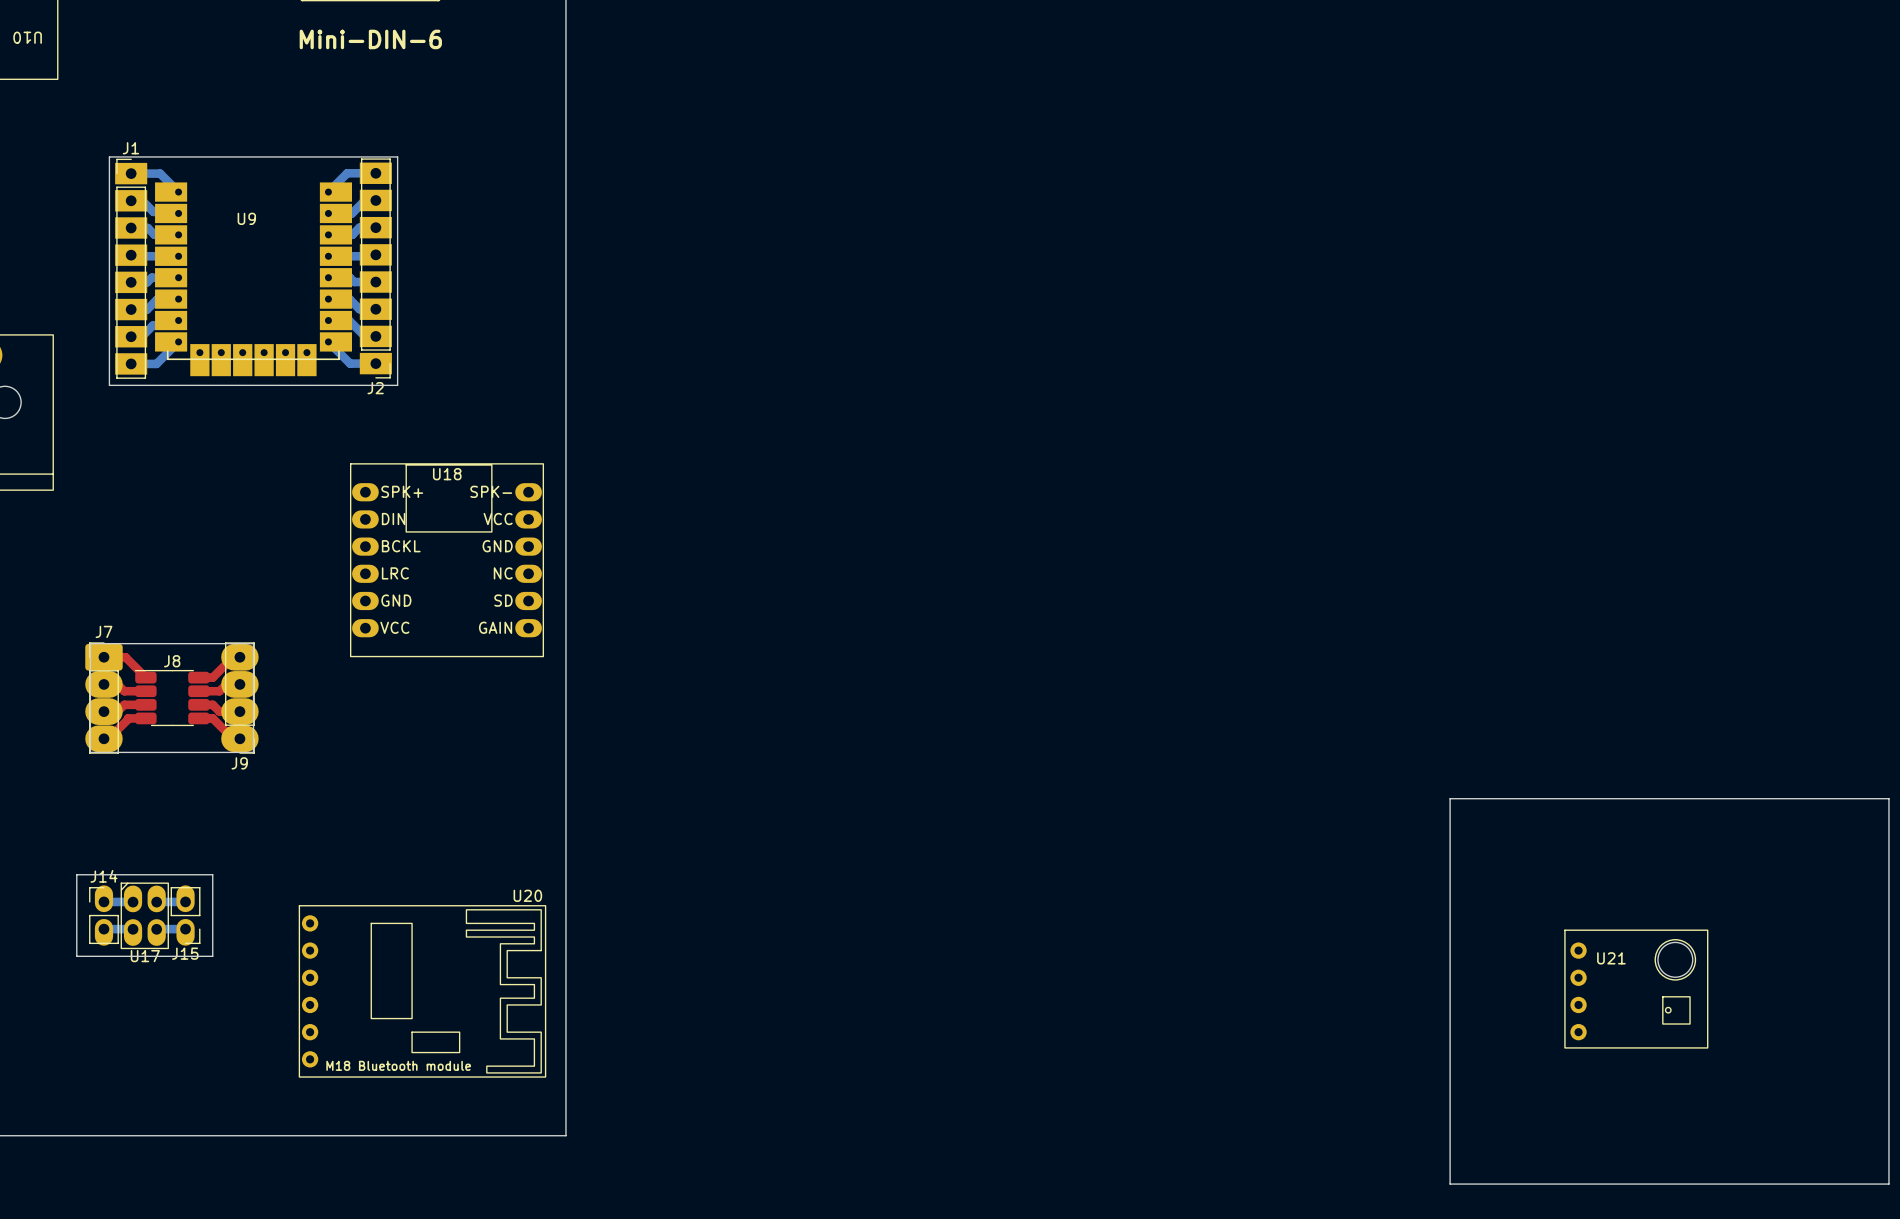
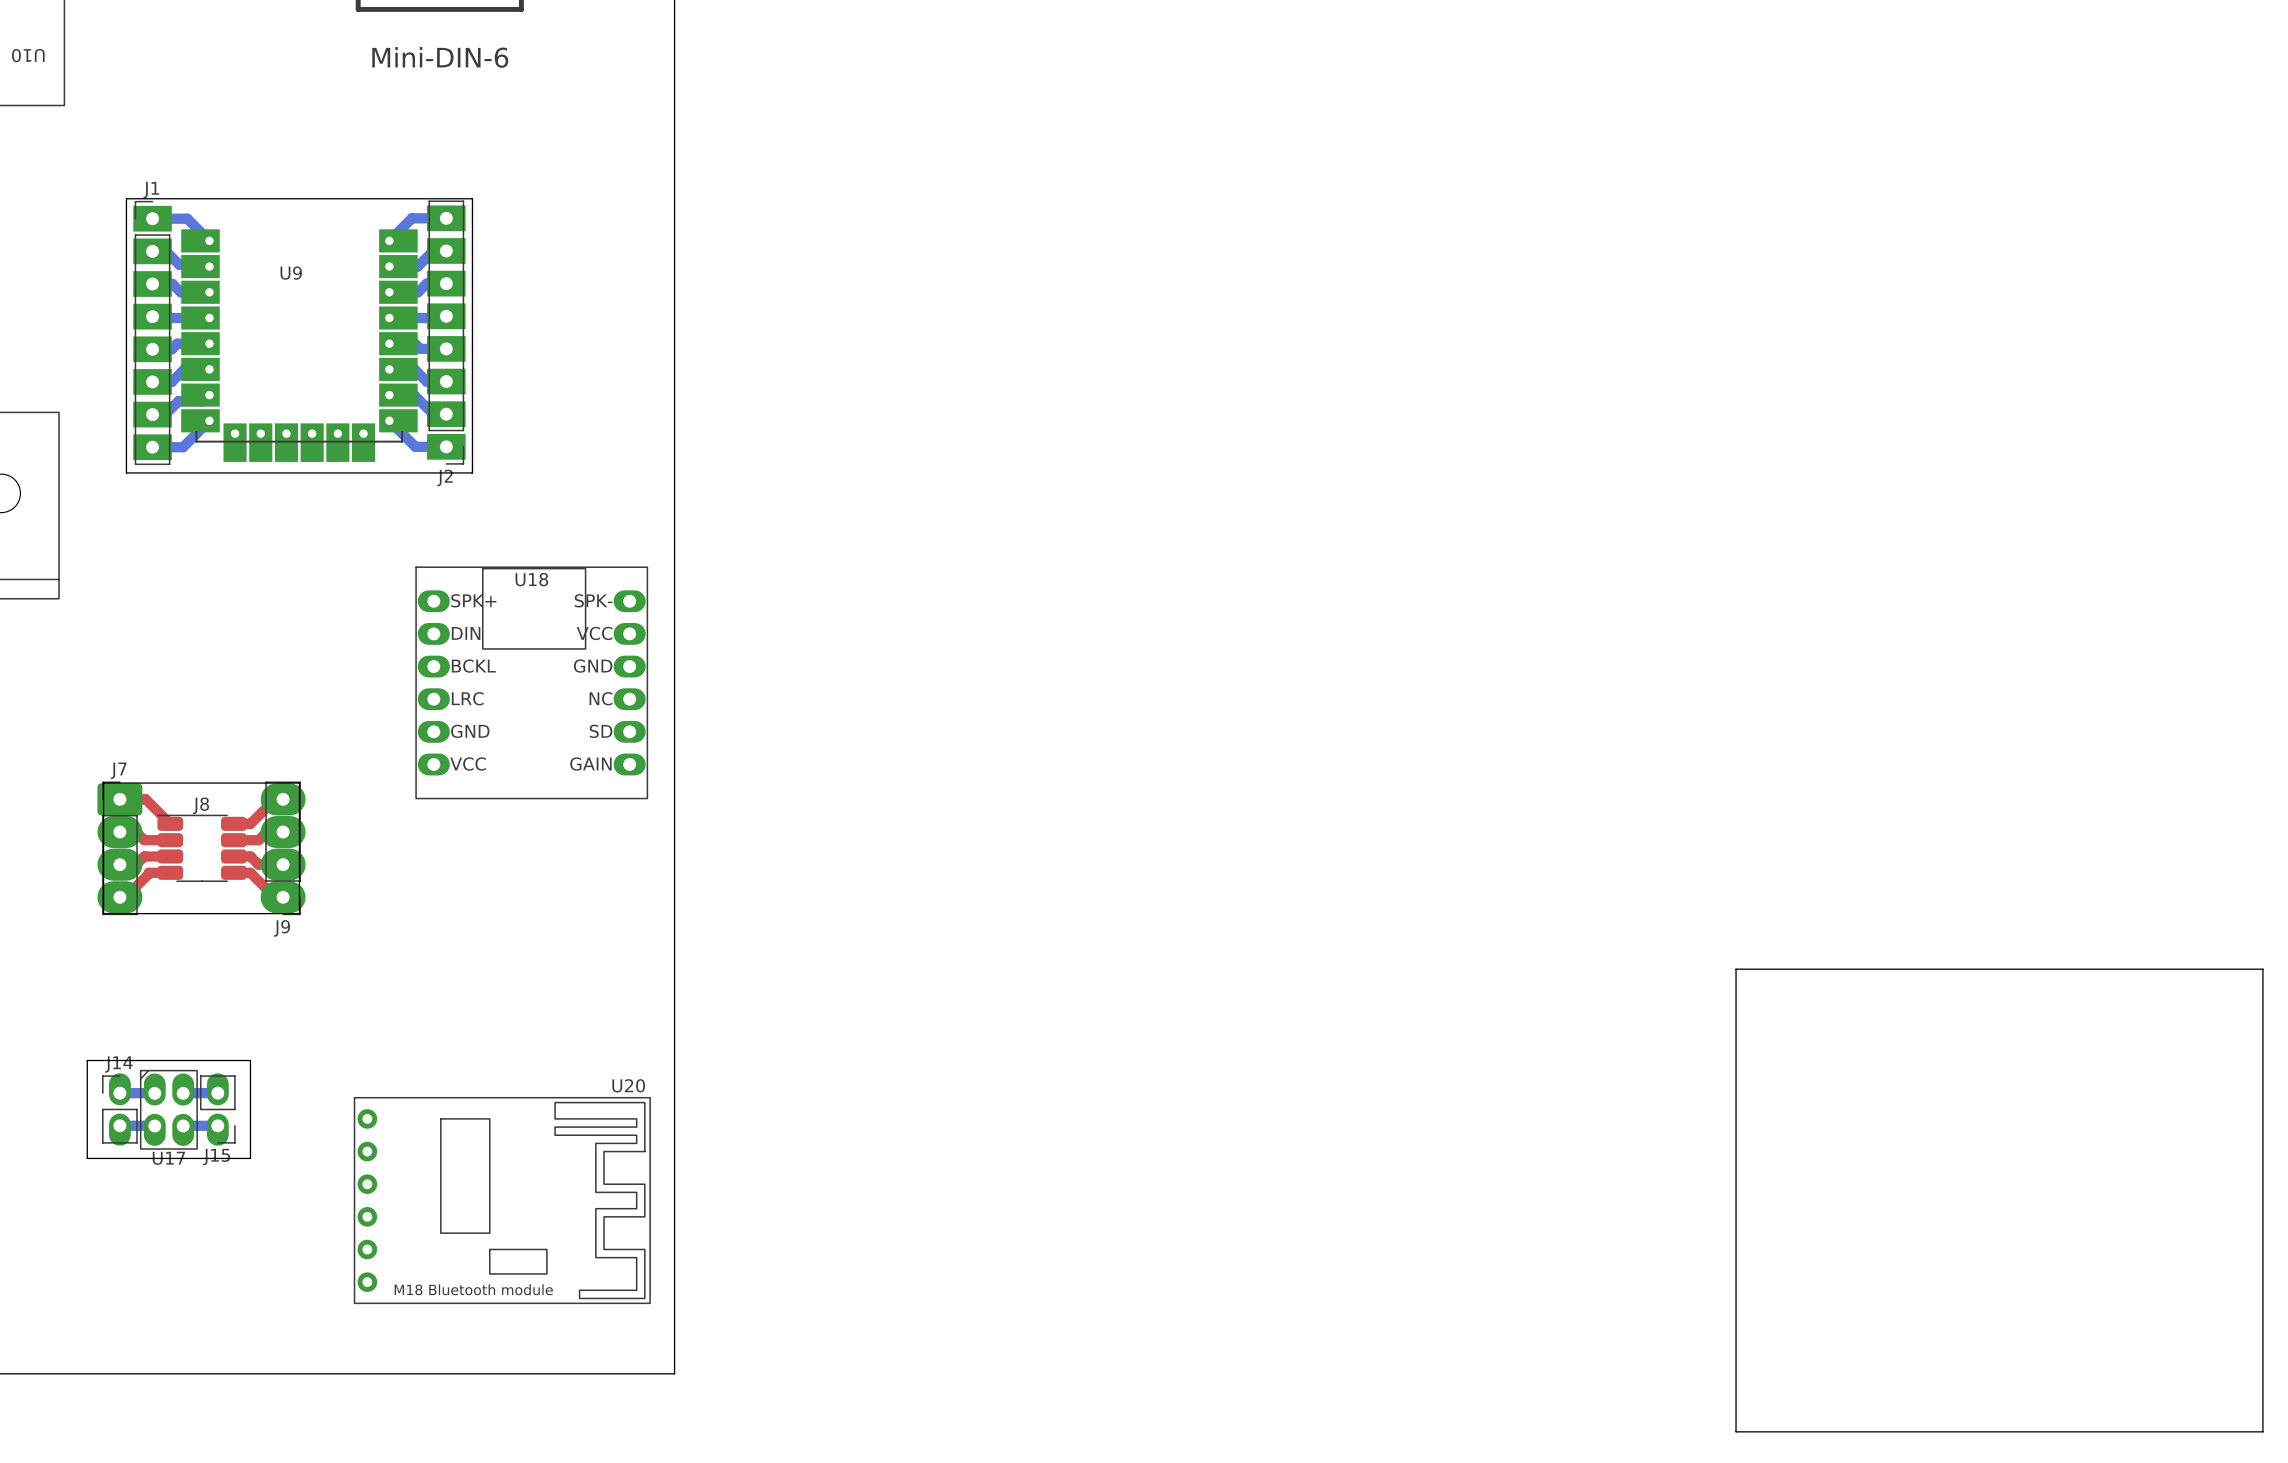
U21: (1636, 989) -> none

